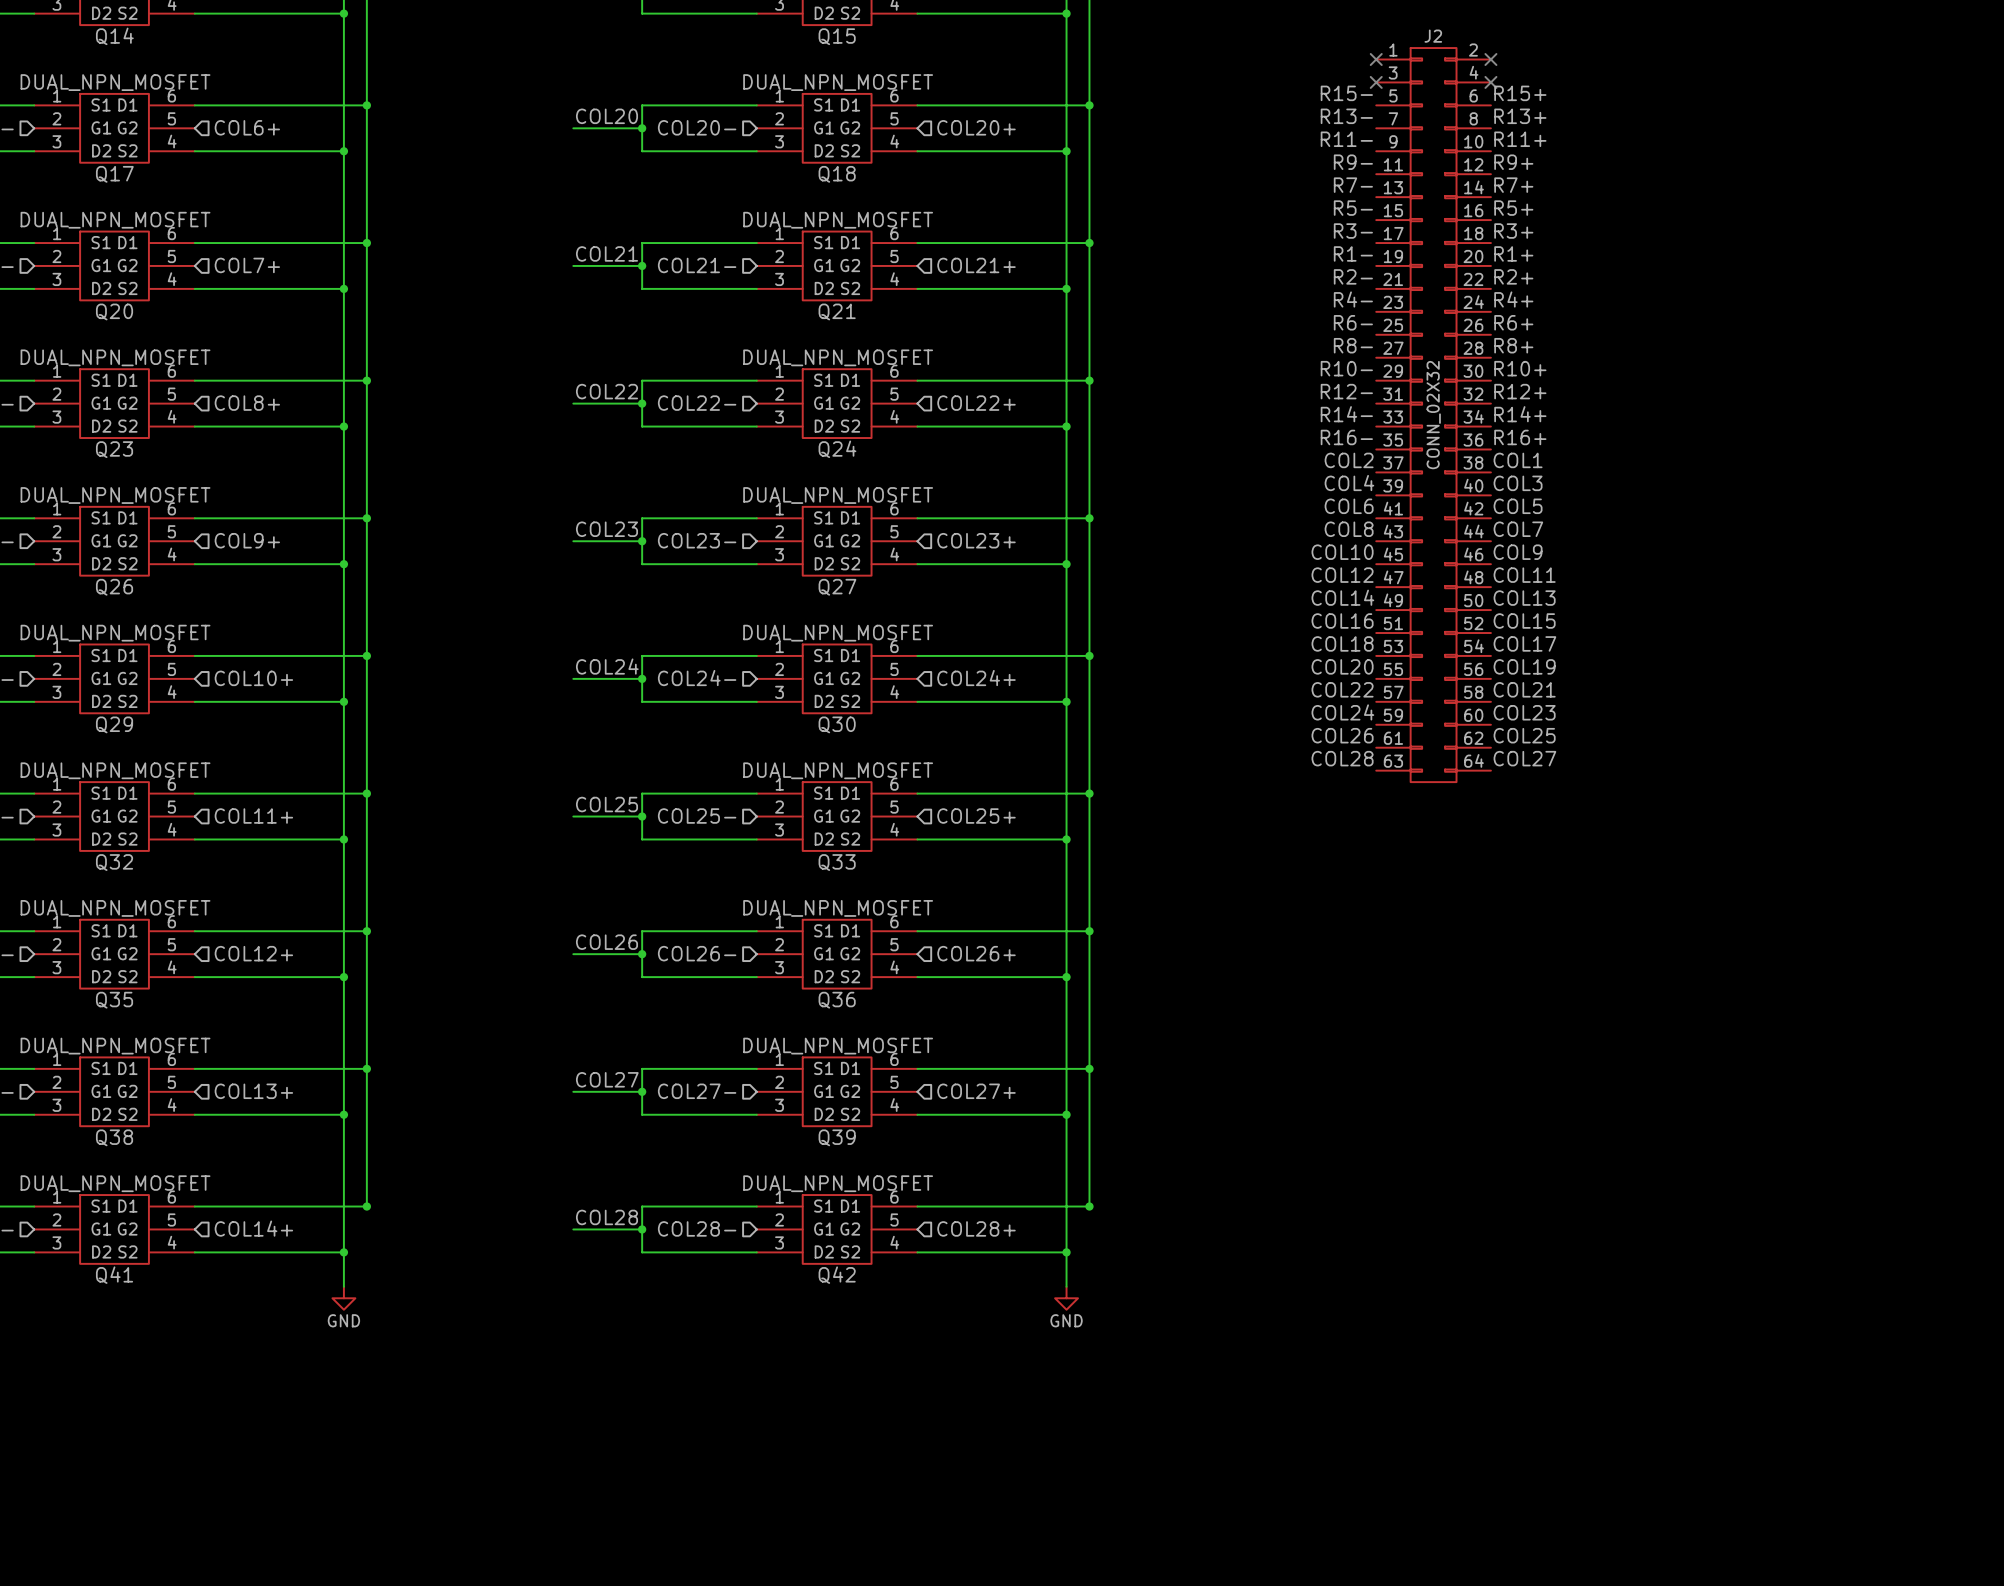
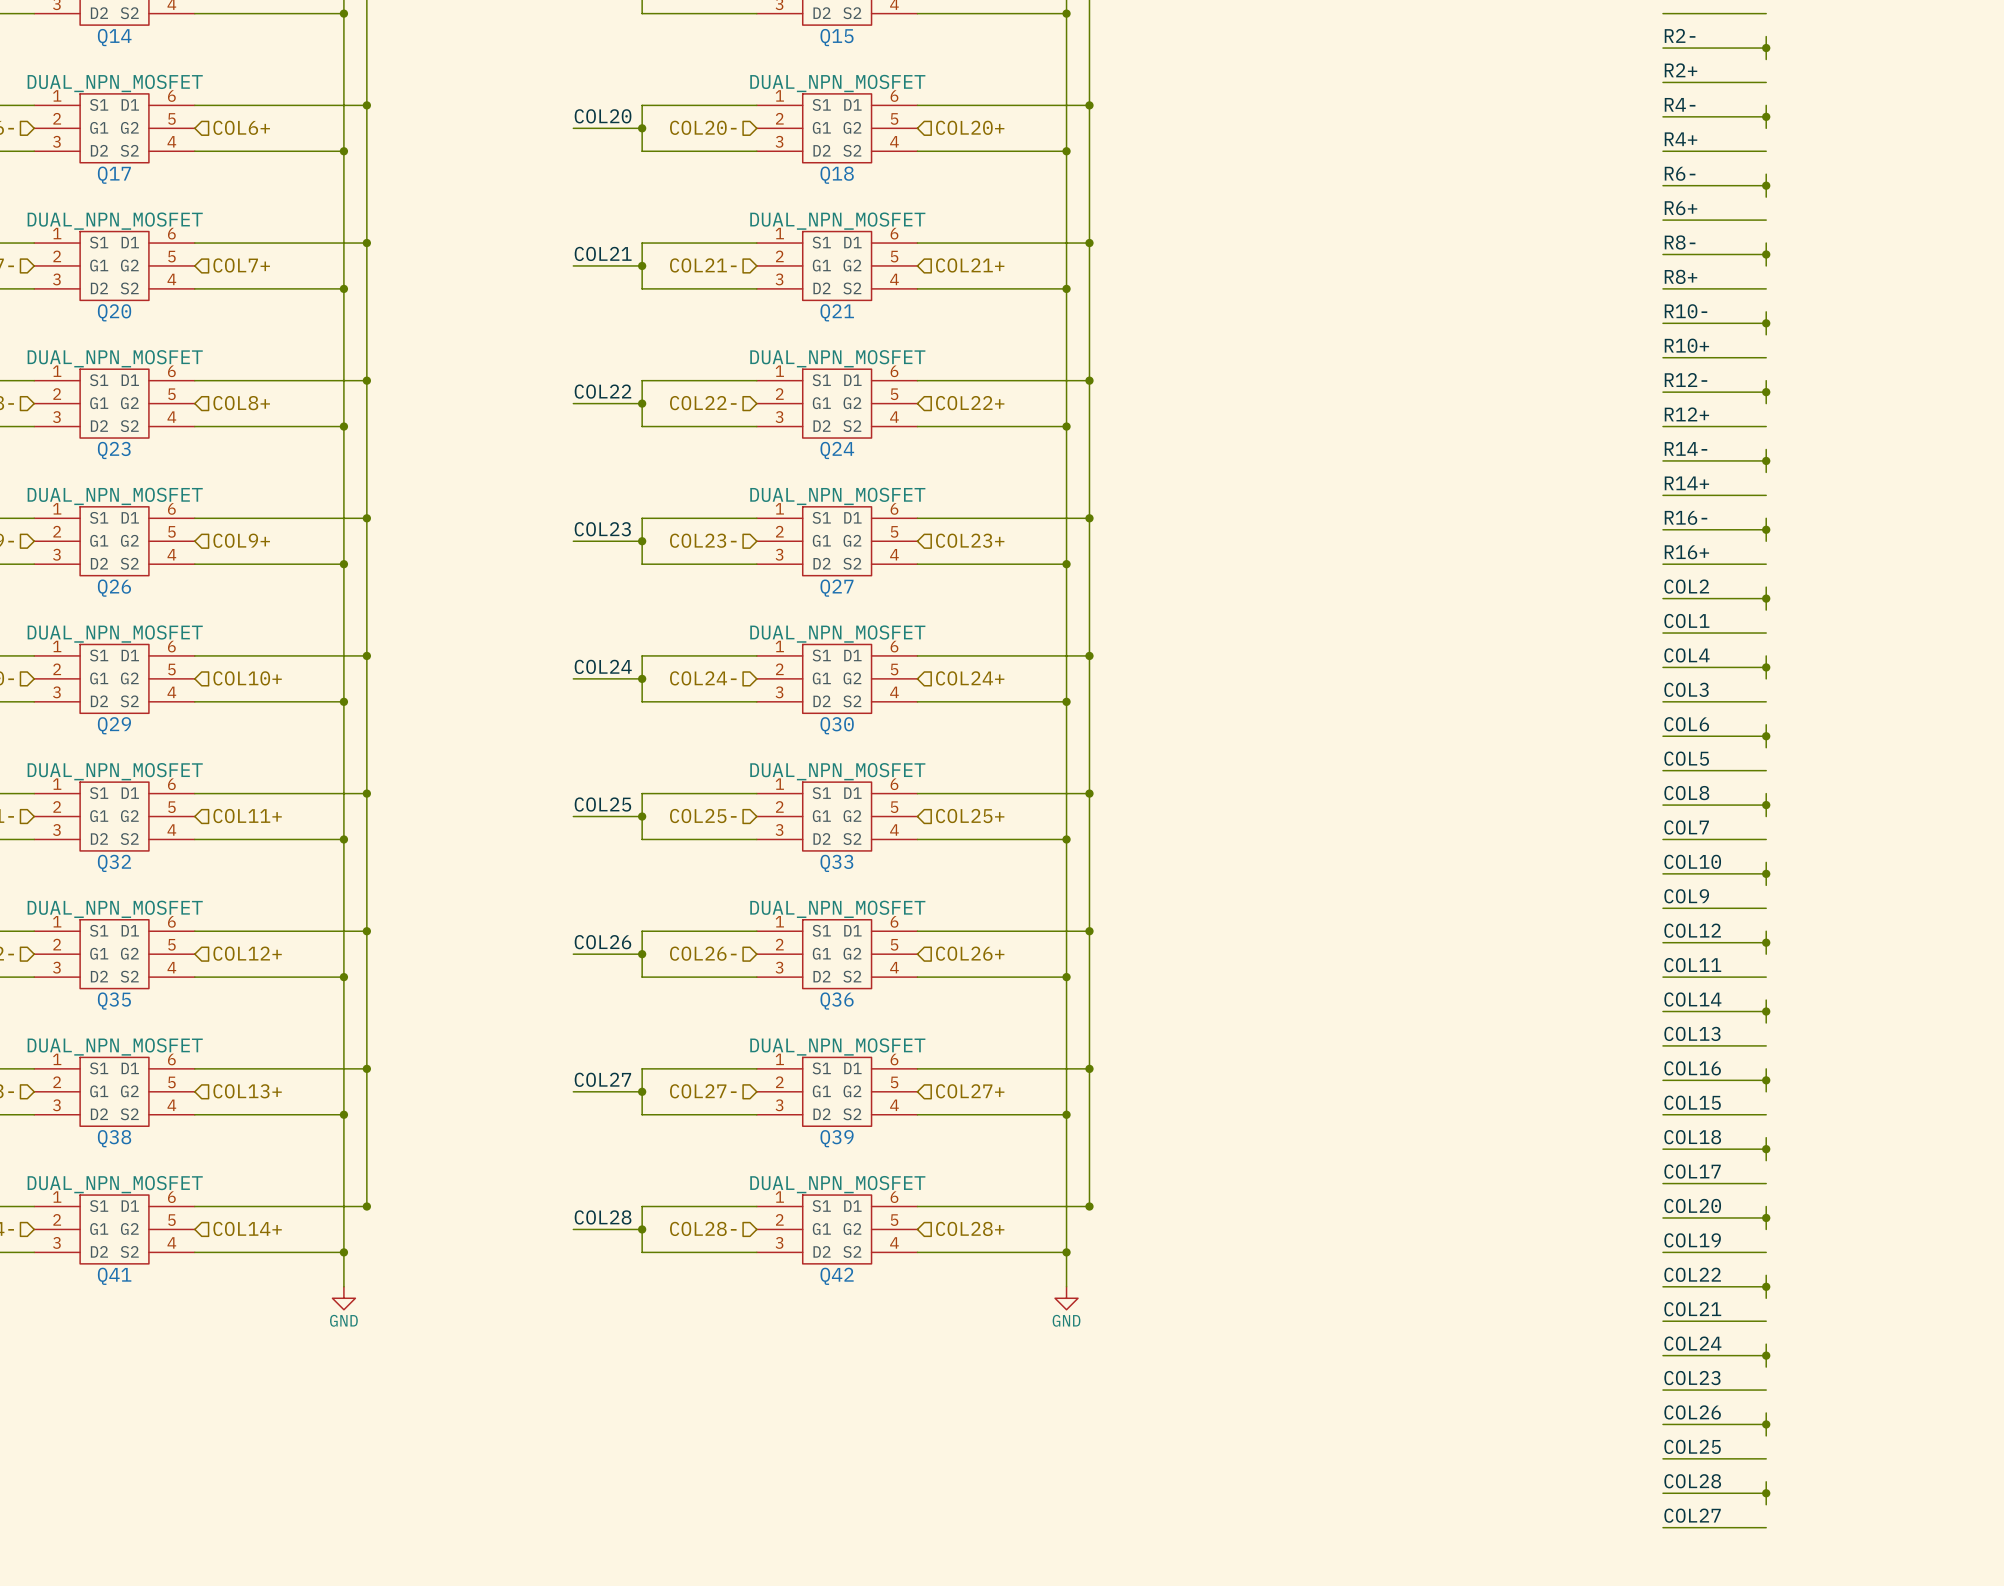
wire: none -> (1662, 13) (1766, 13)
label: none -> R2- (1680, 35)
wire: none -> (1766, 36) (1766, 59)
wire: none -> (1662, 48) (1766, 48)
junction: none -> (1766, 48)
no-connect mark: (1376, 59) -> none
no-connect mark: (1490, 59) -> none
label: none -> R2+ (1681, 70)
no-connect mark: (1376, 82) -> none
no-connect mark: (1490, 82) -> none
wire: none -> (1662, 82) (1766, 82)
label: R15- (1346, 93) -> none
label: R15+ (1520, 93) -> none
label: none -> R4- (1680, 104)
wire: none -> (1766, 105) (1766, 128)
label: R13- (1346, 116) -> none
label: R13+ (1520, 116) -> none
wire: none -> (1662, 116) (1766, 116)
junction: none -> (1766, 116)
label: none -> R4+ (1681, 139)
label: R11- (1346, 139) -> none
label: R11+ (1520, 139) -> none
wire: none -> (1662, 151) (1766, 151)
label: R9- (1353, 162) -> none
label: R9+ (1513, 162) -> none
label: none -> R6- (1680, 173)
wire: none -> (1766, 174) (1766, 197)
label: R7- (1353, 185) -> none
label: R7+ (1513, 185) -> none
wire: none -> (1662, 185) (1766, 185)
junction: none -> (1766, 185)
label: R5- (1353, 208) -> none
label: R5+ (1513, 208) -> none
wire: none -> (1662, 220) (1766, 220)
label: R3- (1353, 231) -> none
label: R3+ (1513, 231) -> none
label: none -> R8- (1680, 242)
wire: none -> (1766, 243) (1766, 265)
label: R1- (1353, 253) -> none
label: R1+ (1513, 253) -> none
wire: none -> (1662, 254) (1766, 254)
junction: none -> (1766, 254)
label: R2- (1353, 276) -> none
label: R2+ (1513, 276) -> none
wire: none -> (1662, 288) (1766, 288)
label: R4- (1353, 299) -> none
label: R4+ (1513, 299) -> none
label: none -> R10- (1686, 311)
wire: none -> (1766, 311) (1766, 334)
label: R6- (1353, 322) -> none
label position: R6+ (1513, 322) -> R6+ (1681, 208)
wire: none -> (1662, 323) (1766, 323)
junction: none -> (1766, 323)
label: R8- (1353, 345) -> none
label position: R8+ (1513, 345) -> R8+ (1681, 276)
wire: none -> (1662, 357) (1766, 357)
label: R10- (1346, 368) -> none
label position: R10+ (1520, 368) -> R10+ (1686, 345)
label: none -> R12- (1686, 380)
wire: none -> (1766, 380) (1766, 403)
label: R12- (1346, 391) -> none
label position: R12+ (1520, 391) -> R12+ (1686, 414)
wire: none -> (1662, 392) (1766, 392)
junction: none -> (1766, 392)
label: R14- (1346, 414) -> none
label position: R14+ (1520, 414) -> R14+ (1686, 483)
J2: CONN_02X32 (1433, 415) -> none
wire: none -> (1662, 426) (1766, 426)
label: R16- (1346, 437) -> none
label position: R16+ (1520, 437) -> R16+ (1686, 552)
label: none -> R14- (1686, 448)
wire: none -> (1766, 449) (1766, 472)
label: COL2 (1349, 460) -> none
label: COL1 (1518, 460) -> none
wire: none -> (1662, 460) (1766, 460)
junction: none -> (1766, 460)
label: COL4 (1349, 483) -> none
label: COL3 (1518, 483) -> none
wire: none -> (1662, 495) (1766, 495)
label: COL6 (1349, 506) -> none
label: COL5 (1518, 506) -> none
label: none -> R16- (1686, 517)
wire: none -> (1766, 518) (1766, 541)
label: COL8 (1349, 529) -> none
label: COL7 (1518, 529) -> none
wire: none -> (1662, 529) (1766, 529)
junction: none -> (1766, 529)
label: COL10 (1342, 552) -> none
label: COL9 (1518, 552) -> none
wire: none -> (1662, 564) (1766, 564)
label: COL12 (1342, 575) -> none
label: COL11 (1524, 575) -> none
label: none -> COL2 (1686, 586)
wire: none -> (1766, 587) (1766, 610)
label: COL14 (1342, 597) -> none
label: COL13 (1524, 598) -> none
wire: none -> (1662, 598) (1766, 598)
junction: none -> (1766, 598)
label: COL16 (1342, 621) -> none
label: COL15 (1524, 621) -> none
label: none -> COL1 (1686, 621)
wire: none -> (1662, 633) (1766, 633)
label: COL18 (1342, 643) -> none
label: COL17 (1524, 643) -> none
label: none -> COL4 (1686, 655)
wire: none -> (1766, 655) (1766, 678)
label: COL20 (1342, 666) -> none
label: COL19 (1524, 666) -> none
wire: none -> (1662, 667) (1766, 667)
junction: none -> (1766, 667)
label: COL22 (1342, 689) -> none
label: COL21 (1524, 689) -> none
label: none -> COL3 (1686, 689)
wire: none -> (1662, 701) (1766, 701)
label: COL24 (1342, 712) -> none
label: COL23 (1524, 712) -> none
label: none -> COL6 (1686, 724)
wire: none -> (1766, 724) (1766, 747)
label: COL26 (1342, 735) -> none
label: COL25 (1524, 735) -> none
wire: none -> (1662, 736) (1766, 736)
junction: none -> (1766, 736)
label: COL28 (1342, 758) -> none
label: COL27 (1524, 758) -> none
label: none -> COL5 (1686, 758)
wire: none -> (1662, 770) (1766, 770)
label: none -> COL8 (1686, 793)
wire: none -> (1766, 793) (1766, 816)
wire: none -> (1662, 805) (1766, 805)
junction: none -> (1766, 805)
label: none -> COL7 (1686, 827)
wire: none -> (1662, 839) (1766, 839)
label: none -> COL10 (1692, 861)
wire: none -> (1766, 862) (1766, 885)
wire: none -> (1662, 873) (1766, 873)
junction: none -> (1766, 873)
label: none -> COL9 (1686, 896)
wire: none -> (1662, 908) (1766, 908)
label: none -> COL12 (1692, 930)
wire: none -> (1766, 931) (1766, 954)
wire: none -> (1662, 942) (1766, 942)
junction: none -> (1766, 942)
label: none -> COL11 (1692, 965)
wire: none -> (1662, 977) (1766, 977)
label: none -> COL14 (1692, 999)
wire: none -> (1766, 1000) (1766, 1022)
wire: none -> (1662, 1011) (1766, 1011)
junction: none -> (1766, 1011)
label: none -> COL13 (1692, 1033)
wire: none -> (1662, 1045) (1766, 1045)
label: none -> COL16 (1692, 1068)
wire: none -> (1766, 1068) (1766, 1091)
wire: none -> (1662, 1080) (1766, 1080)
junction: none -> (1766, 1080)
label: none -> COL15 (1692, 1102)
wire: none -> (1662, 1114) (1766, 1114)
label: none -> COL18 (1692, 1137)
wire: none -> (1766, 1137) (1766, 1160)
wire: none -> (1662, 1149) (1766, 1149)
junction: none -> (1766, 1149)
label: none -> COL17 (1692, 1171)
wire: none -> (1662, 1183) (1766, 1183)
label: none -> COL20 (1692, 1205)
wire: none -> (1766, 1206) (1766, 1229)
wire: none -> (1662, 1217) (1766, 1217)
junction: none -> (1766, 1217)
label: none -> COL19 (1692, 1240)
wire: none -> (1662, 1252) (1766, 1252)
label: none -> COL22 (1692, 1274)
wire: none -> (1766, 1275) (1766, 1298)
wire: none -> (1662, 1286) (1766, 1286)
junction: none -> (1766, 1286)
label: none -> COL21 (1692, 1309)
wire: none -> (1662, 1321) (1766, 1321)
label: none -> COL24 (1692, 1343)
wire: none -> (1766, 1344) (1766, 1367)
wire: none -> (1662, 1355) (1766, 1355)
junction: none -> (1766, 1355)
label: none -> COL23 (1692, 1378)
wire: none -> (1662, 1390) (1766, 1390)
label: none -> COL26 (1692, 1412)
wire: none -> (1766, 1412) (1766, 1435)
wire: none -> (1662, 1424) (1766, 1424)
junction: none -> (1766, 1424)
label: none -> COL25 (1692, 1446)
wire: none -> (1662, 1458) (1766, 1458)
label: none -> COL28 (1692, 1481)
wire: none -> (1766, 1481) (1766, 1504)
wire: none -> (1662, 1493) (1766, 1493)
junction: none -> (1766, 1493)
label: none -> COL27 (1692, 1515)
wire: none -> (1662, 1527) (1766, 1527)

